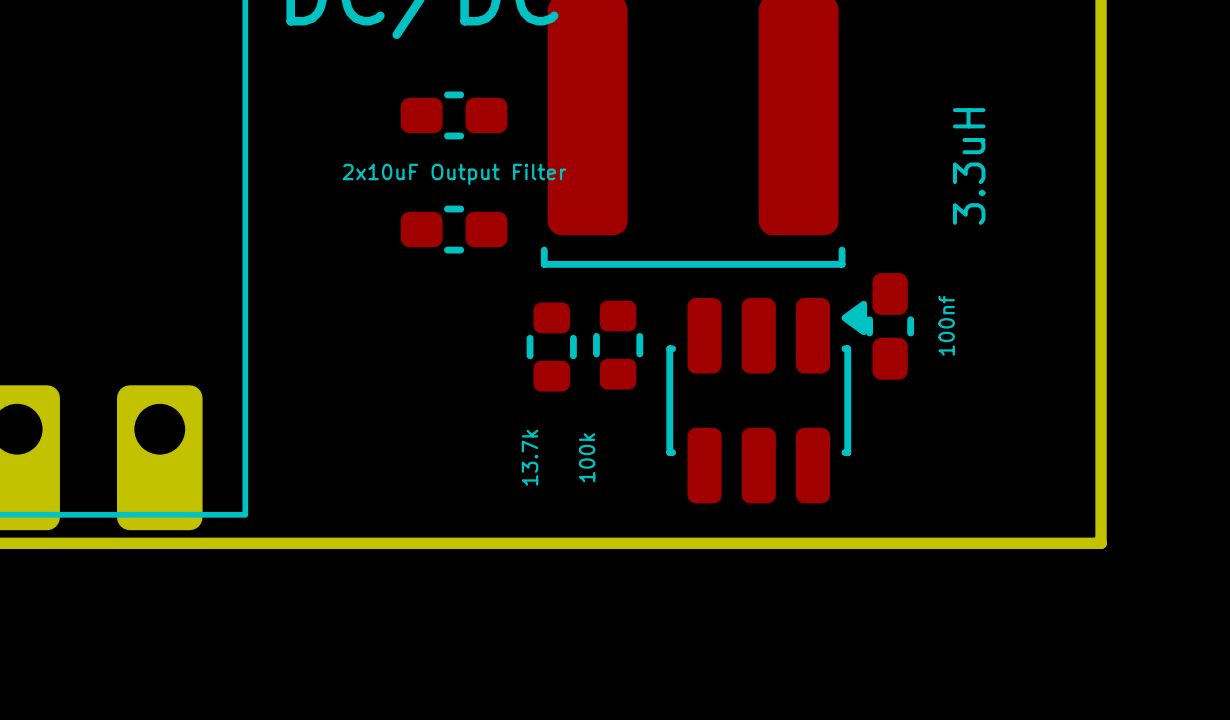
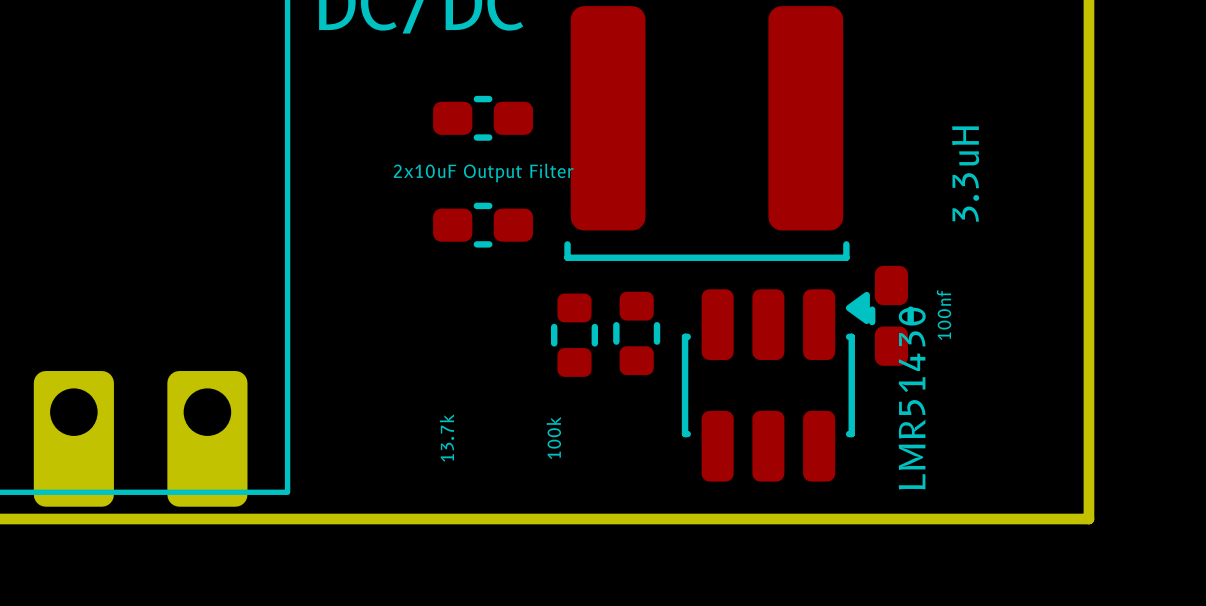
text: none -> LMR51430 (912, 398)
text position: 13.7k (530, 457) -> 13.7k (446, 438)
text position: 100k (587, 457) -> 100k (553, 438)

